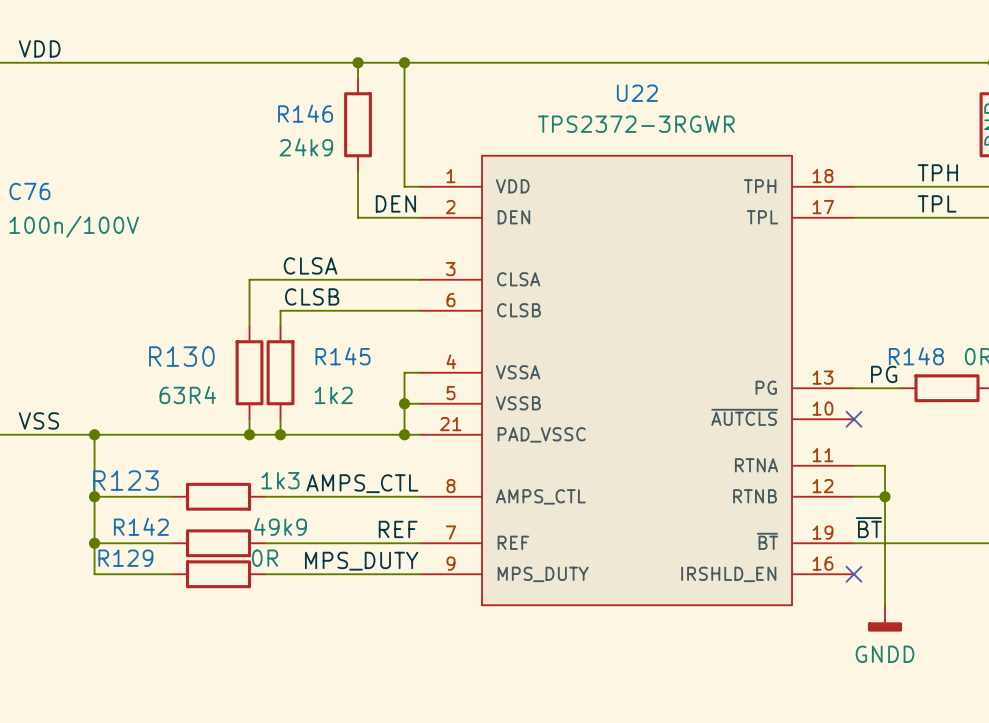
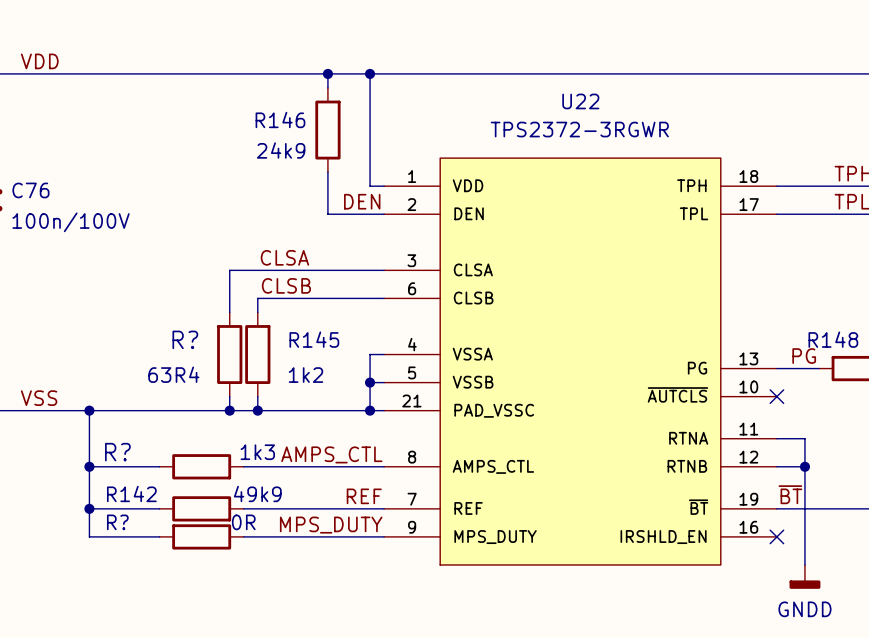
R130 name: R130 (181, 356) -> R? (185, 339)
R123 name: R123 (125, 480) -> R? (117, 452)
R129 name: R129 (125, 558) -> R? (117, 522)

